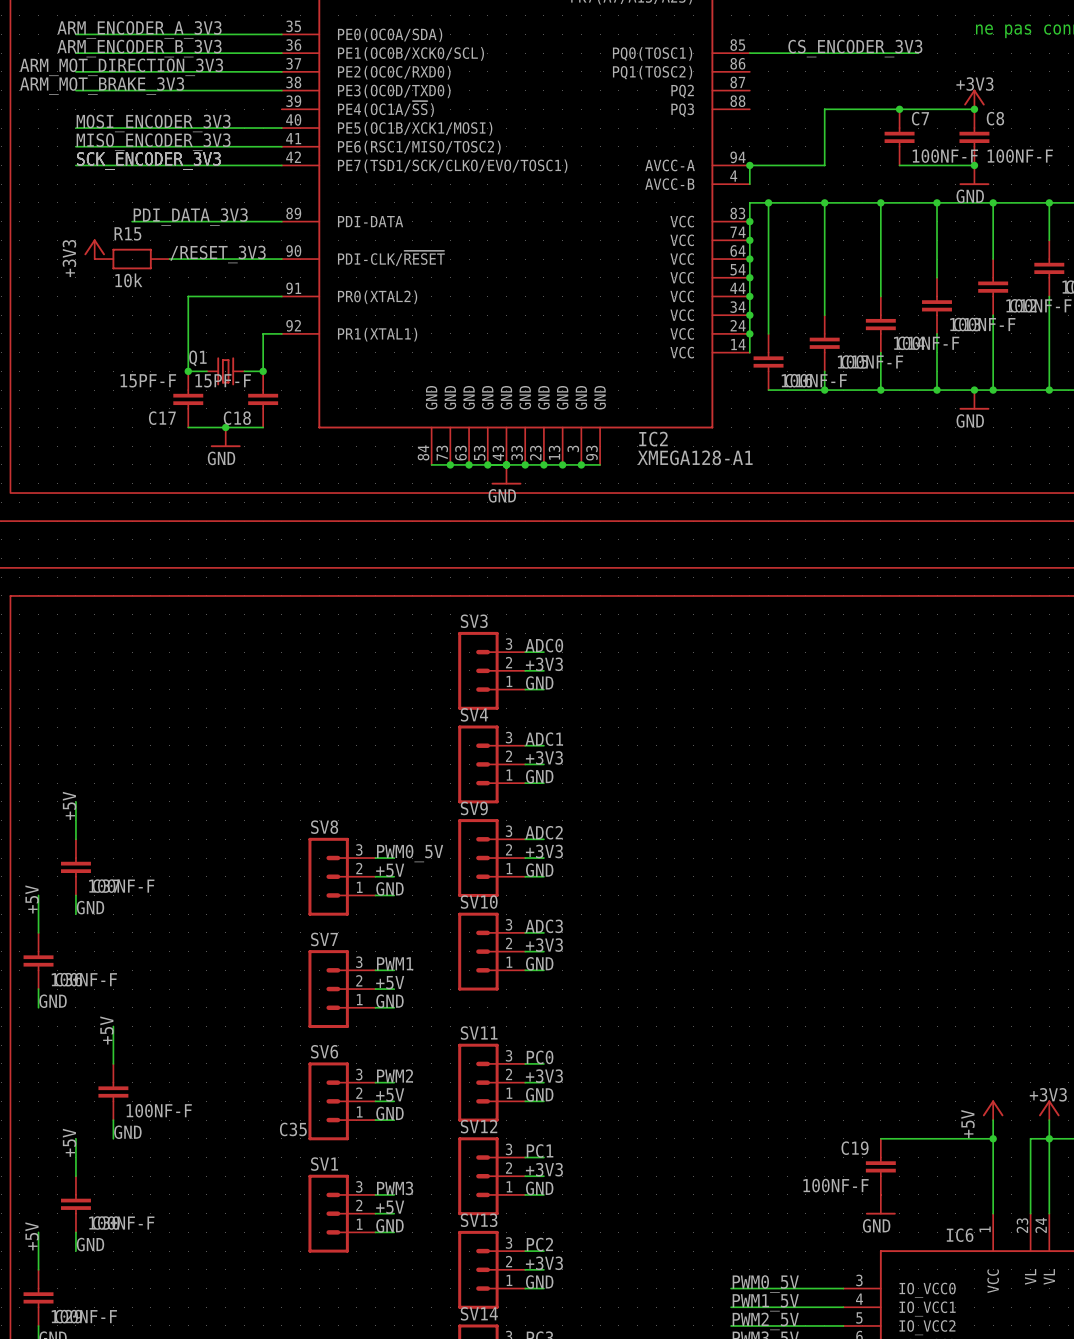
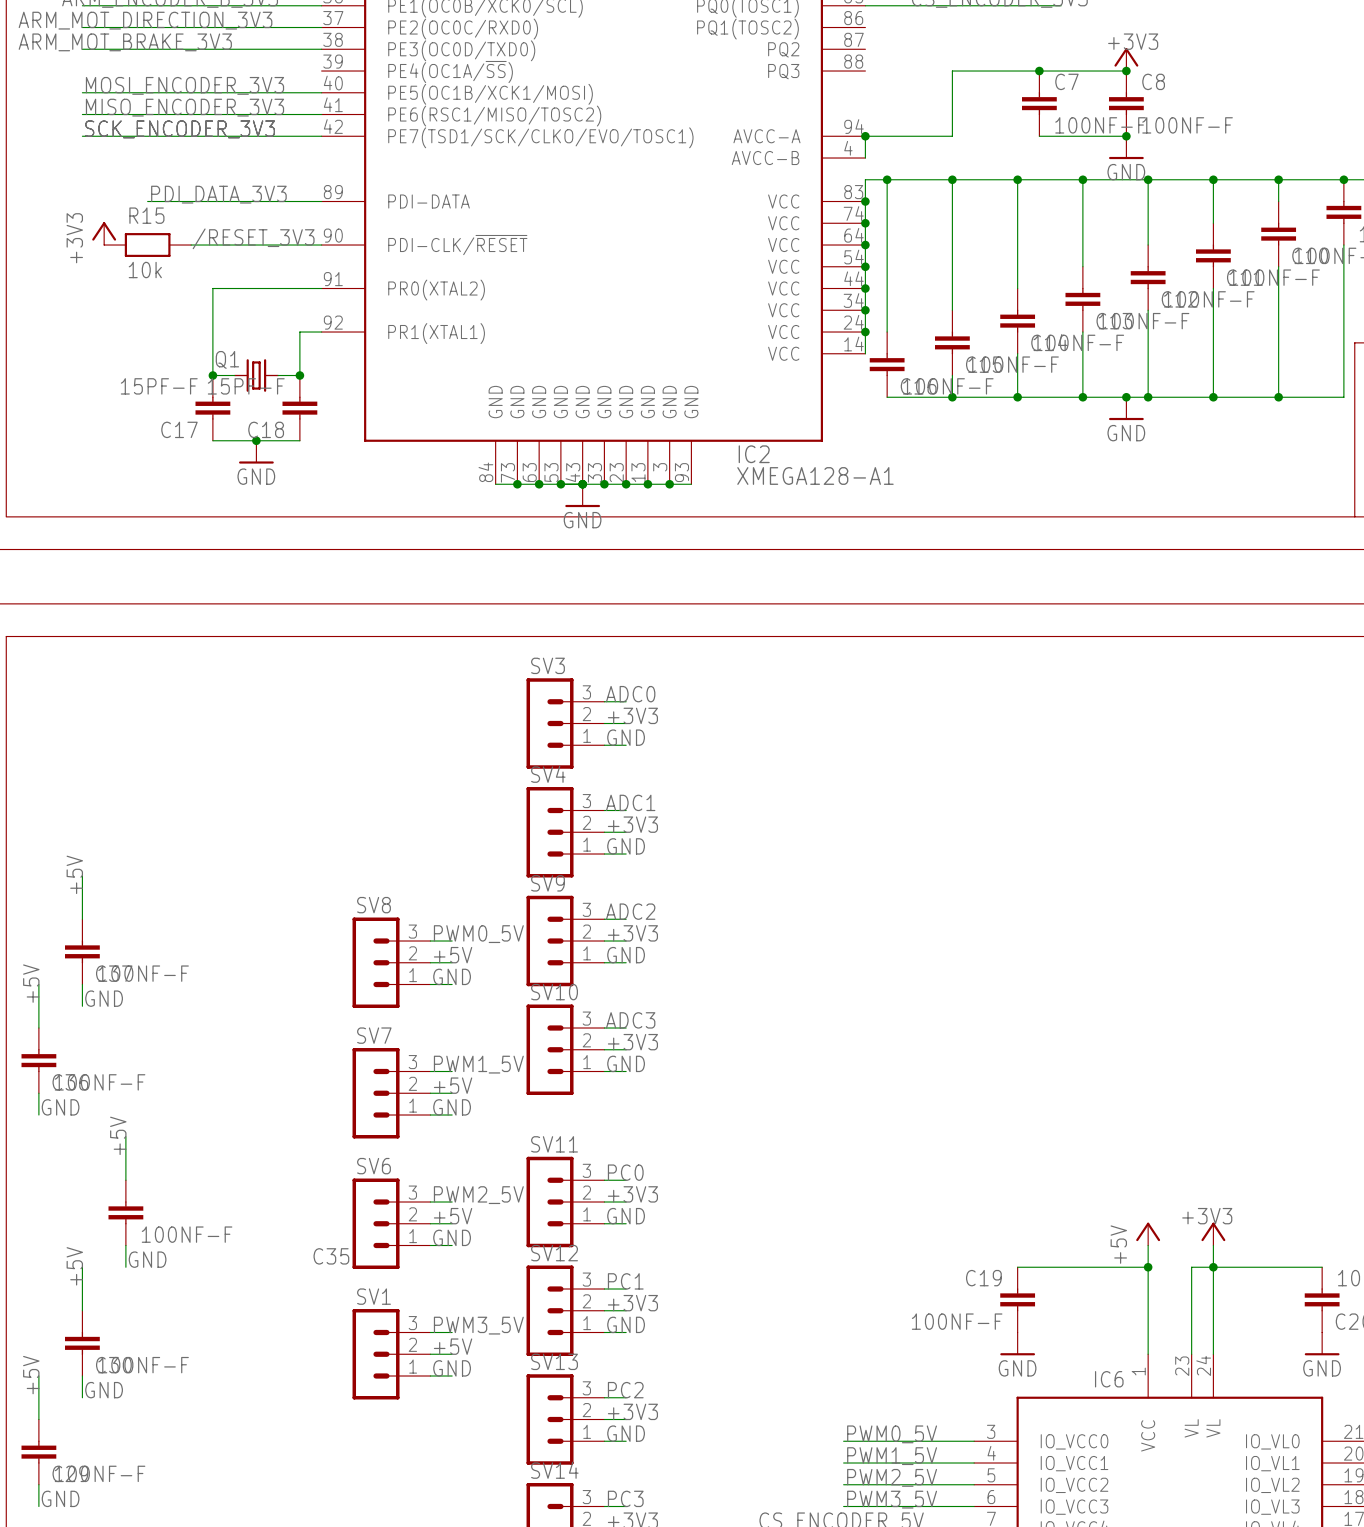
label: PWM1 (395, 963) -> PWM1_5V (478, 1064)
label: PWM2 (395, 1075) -> PWM2_5V (478, 1195)
label: PWM3 (395, 1188) -> PWM3_5V (478, 1325)

